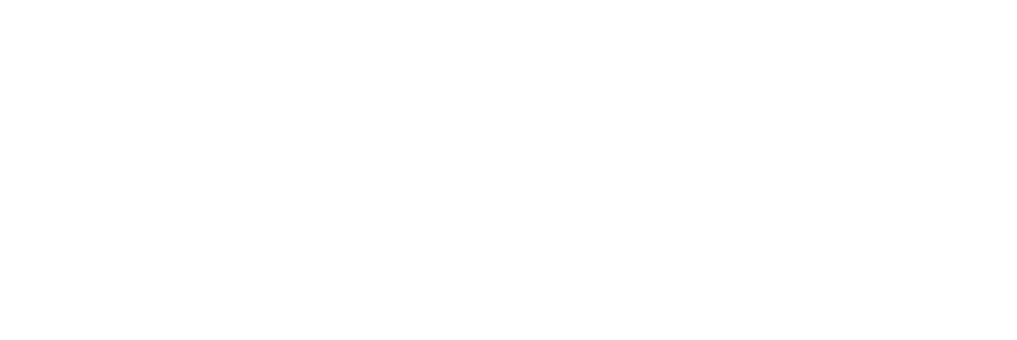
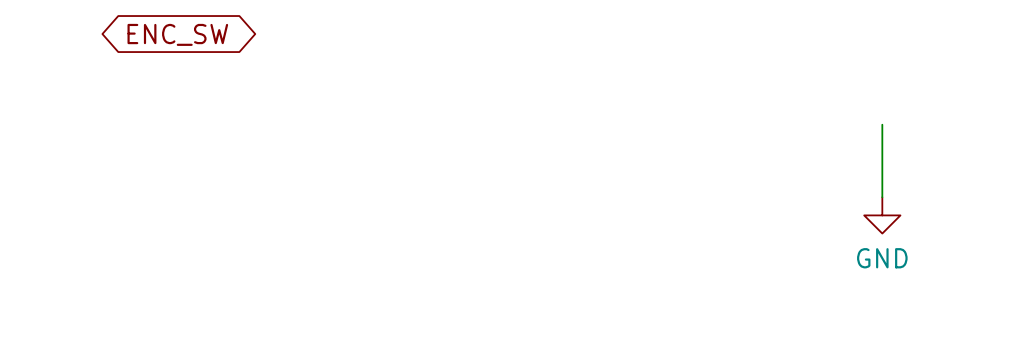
global label: none -> ENC_SW (177, 34)
wire: none -> (882, 124) (882, 197)
power symbol: none -> GND (882, 215)

